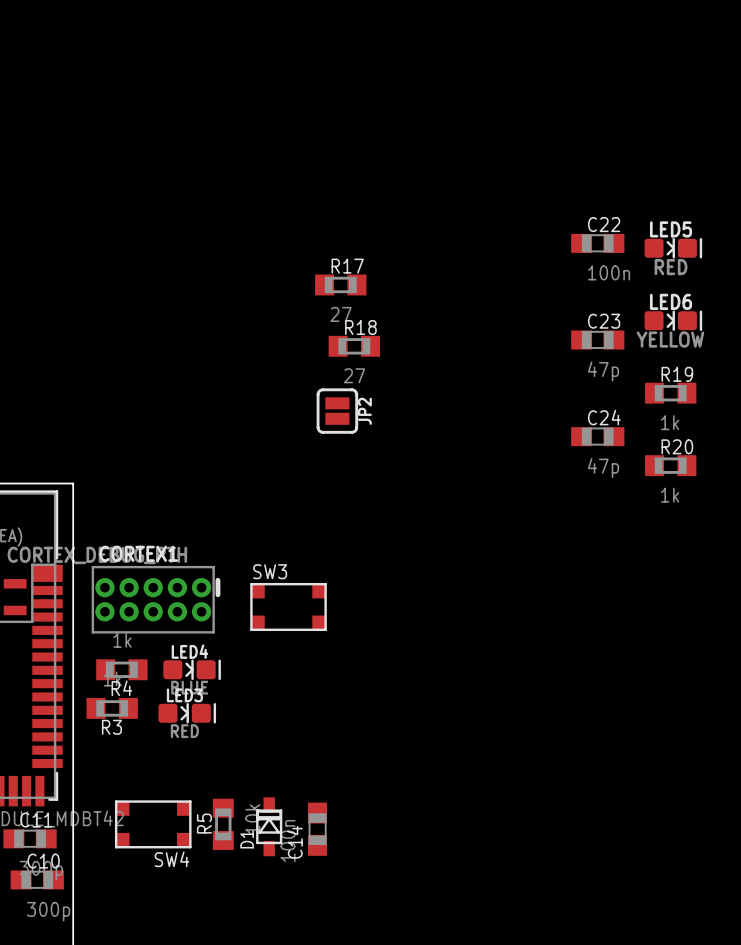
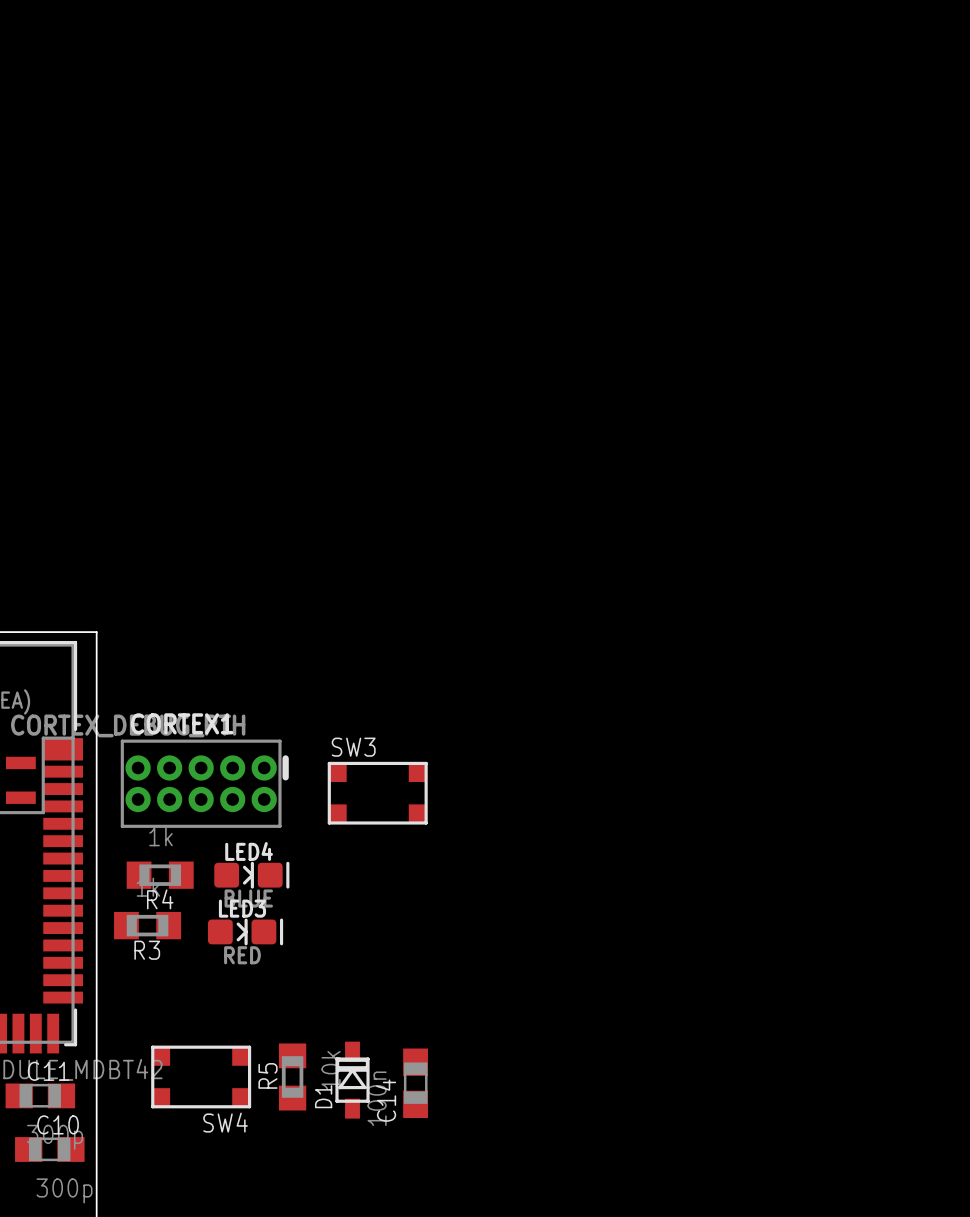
C22: 100n (597, 243) -> none
LED5: RED (673, 248) -> none
R17: 27 (340, 284) -> none
LED6: YELLOW (673, 320) -> none
C23: 47p (597, 340) -> none
R18: 27 (354, 346) -> none
R19: 1k (670, 393) -> none
JP2: (337, 411) -> none
C24: 47p (597, 436) -> none
R20: 1k (670, 465) -> none

